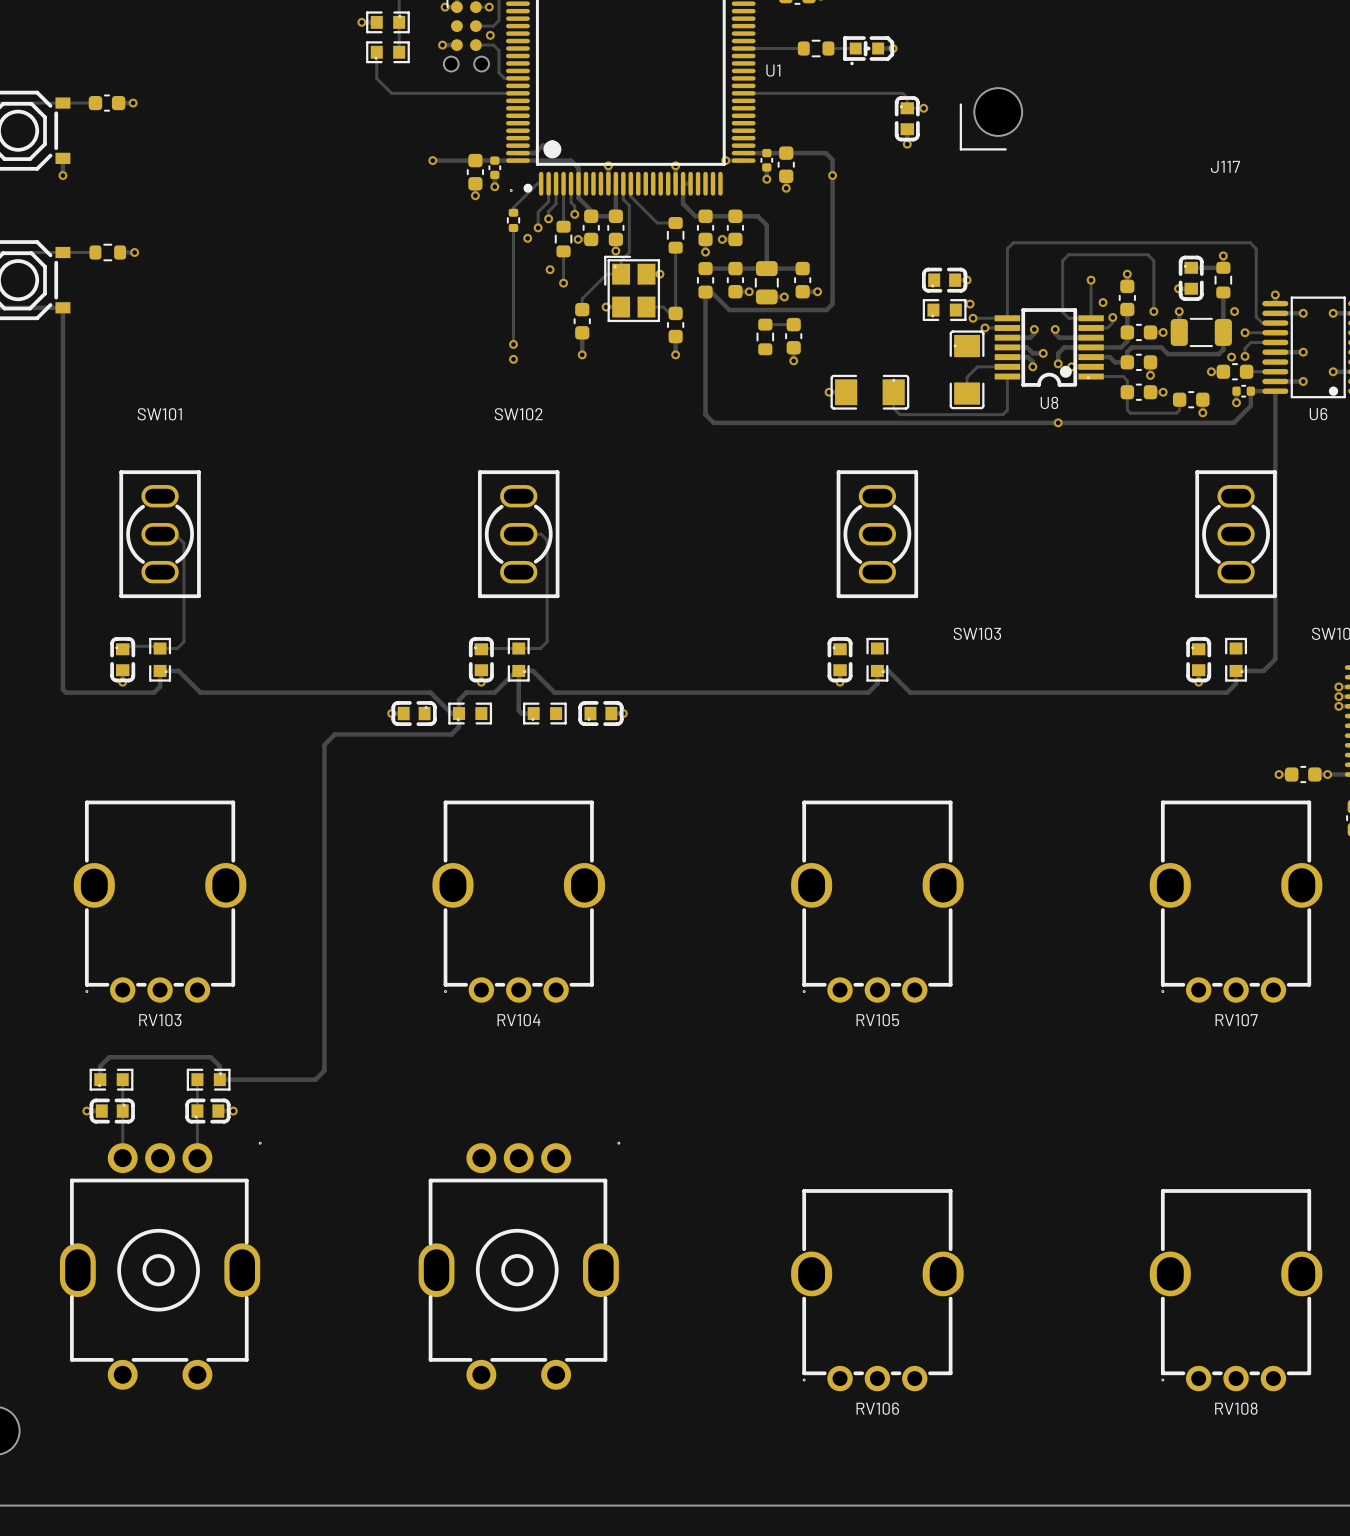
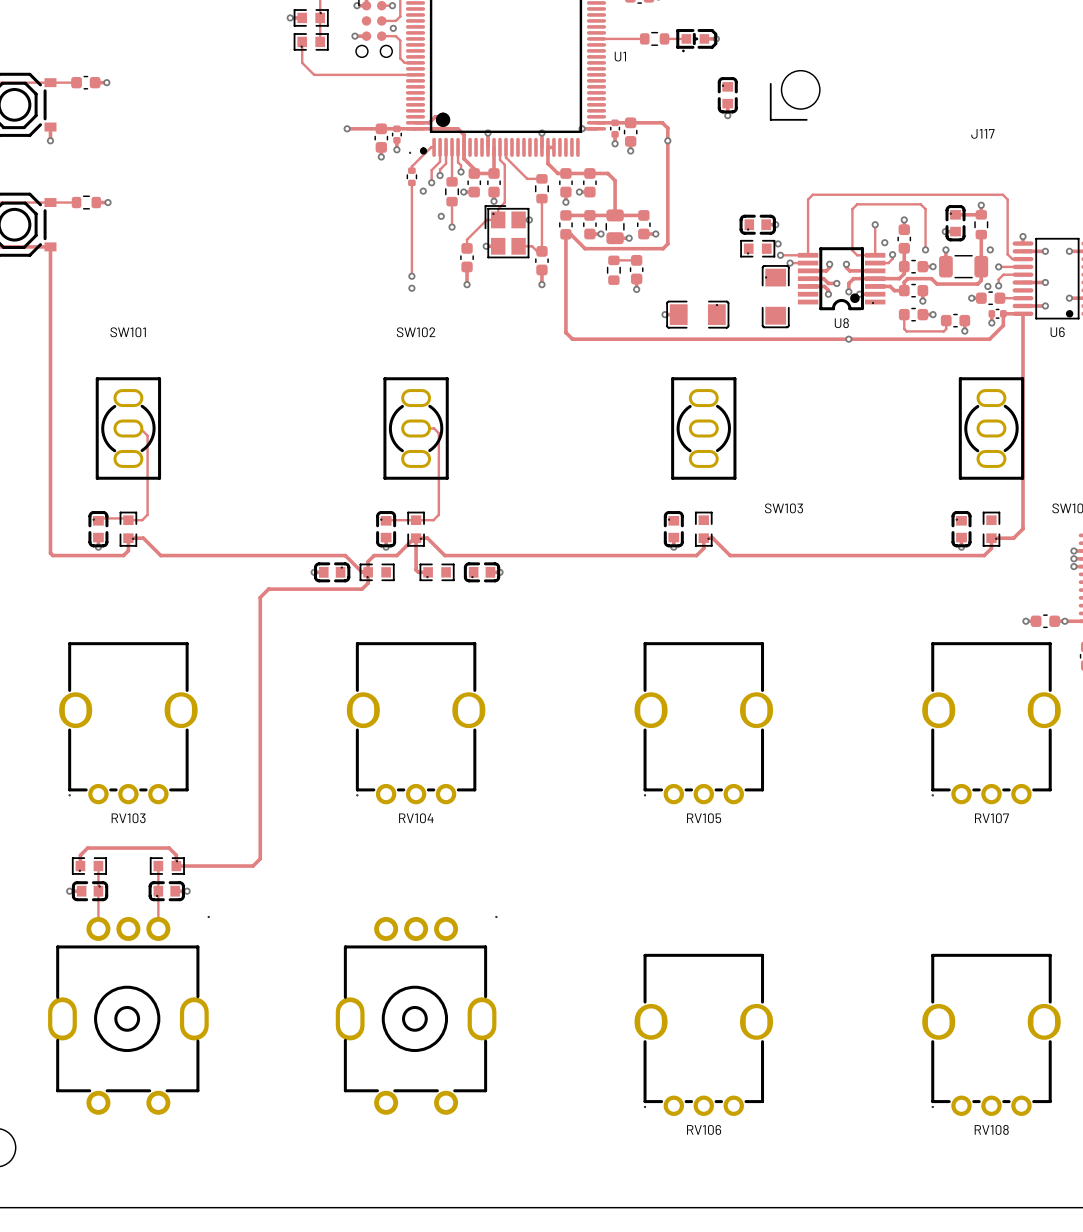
track: (743, 93) (902, 93) (907, 97) (907, 108) (923, 108) -> none
via: (923, 108) -> none
track: (1007, 366) (977, 366) (967, 377) (967, 393) -> none
track: (1007, 376) (1007, 410) (1002, 414) (899, 414) (893, 408) (893, 392) -> none
track: (1091, 376) (1123, 376) (1127, 380) (1127, 392) -> none

